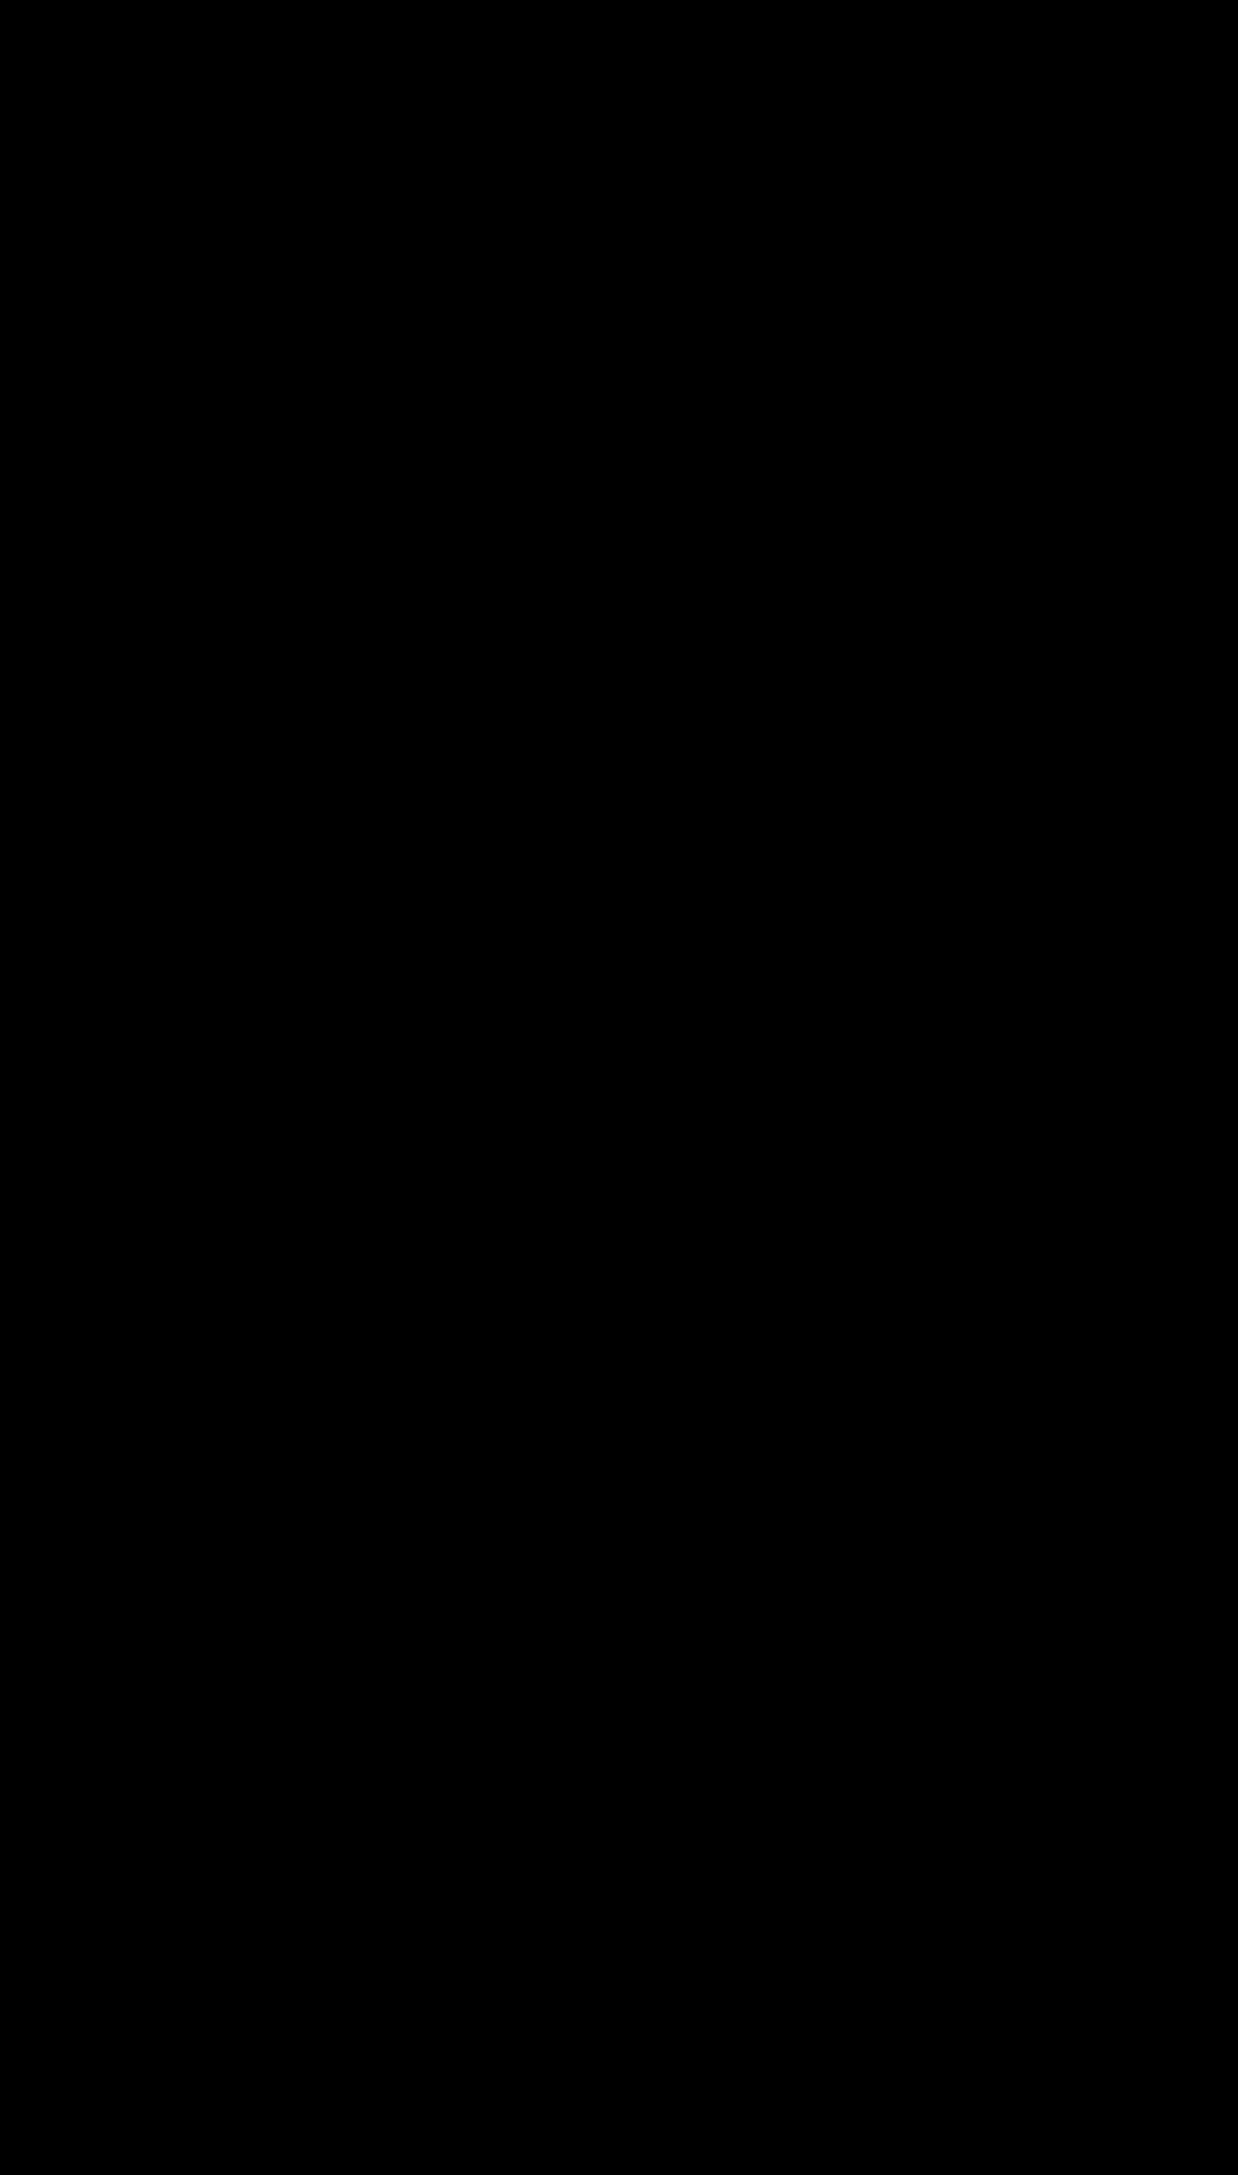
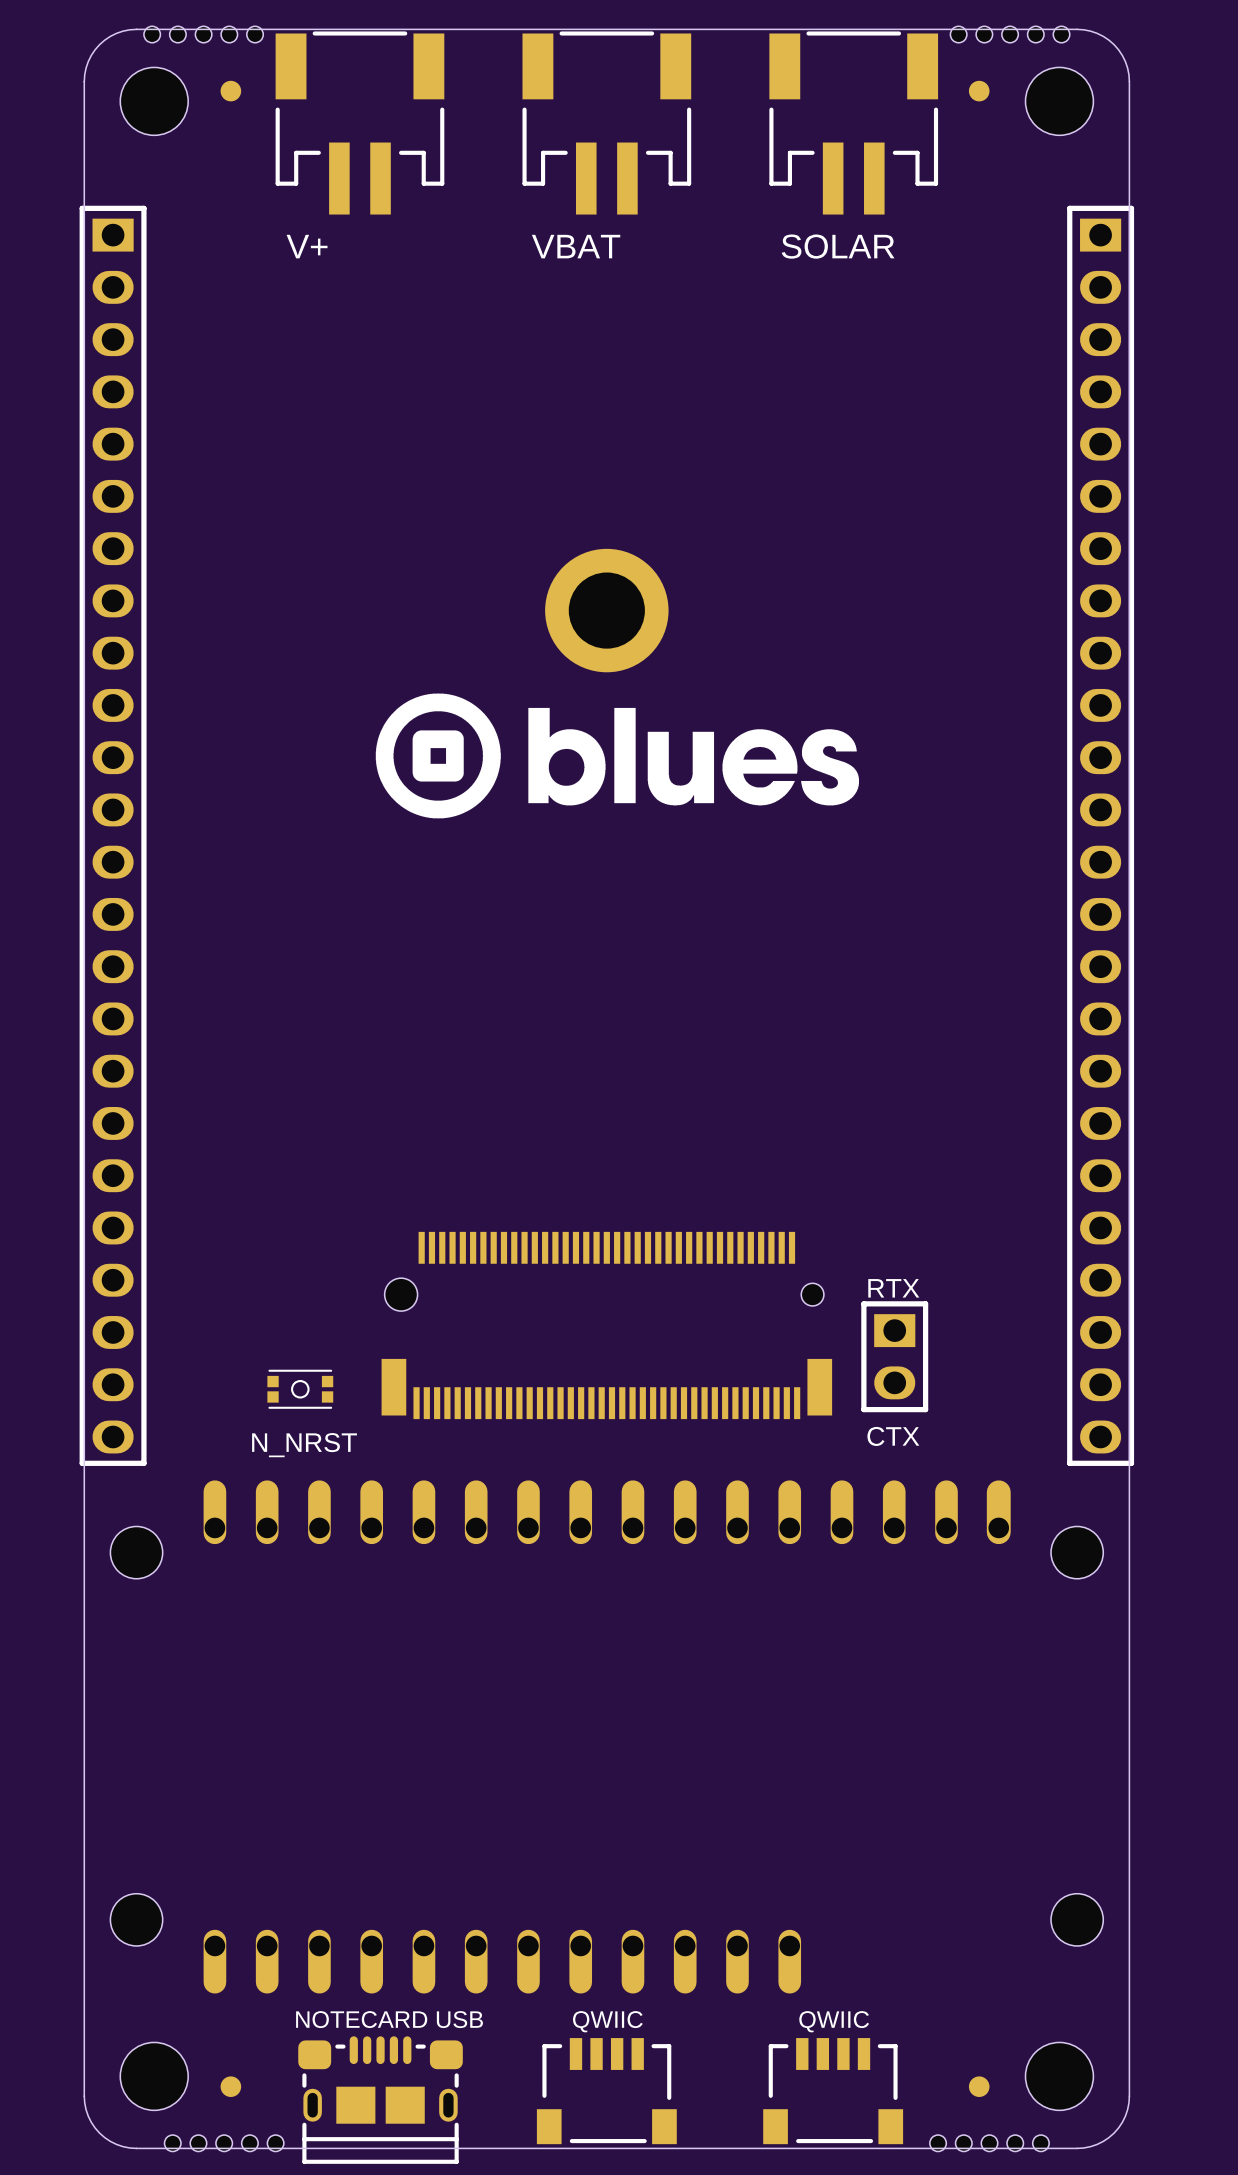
board edge: none -> (136, 29) (1077, 29) (1097, 33) (1108, 40) (1118, 49) (1125, 61) (1129, 81) (1129, 2096) (1125, 2116) (1118, 2127) (1108, 2137) (1097, 2144) (1077, 2148) (136, 2148) (123, 2146) (110, 2141) (95, 2127) (88, 2116) (84, 2096) (84, 81) (88, 61) (99, 44) (116, 33) (136, 29)
part: none -> (152, 34)
part: none -> (177, 34)
part: none -> (203, 34)
part: none -> (229, 34)
part: none -> (255, 34)
part: none -> (958, 34)
part: none -> (984, 34)
part: none -> (1010, 34)
part: none -> (1035, 34)
part: none -> (1061, 34)
part: none -> (230, 91)
part: none -> (979, 91)
part: none -> (154, 101)
part: none -> (1059, 101)
part: none -> (359, 122)
part: none -> (606, 122)
part: none -> (853, 122)
text: none -> V+ (307, 246)
text: none -> VBAT (576, 246)
text: none -> SOLAR (838, 246)
part: none -> (606, 610)
drawing: none -> [375, 693, 501, 819]
drawing: none -> [528, 707, 860, 806]
part: none -> (113, 835)
part: none -> (1100, 835)
text: none -> RTX (893, 1288)
part: none -> (606, 1325)
part: none -> (894, 1356)
part: none -> (300, 1389)
text: none -> CTX (893, 1436)
text: none -> N_NRST (304, 1445)
part: none -> (607, 1512)
part: none -> (136, 1552)
part: none -> (1077, 1552)
part: none -> (136, 1919)
part: none -> (1077, 1919)
part: none -> (502, 1961)
text: none -> NOTECARD USB (389, 2019)
text: none -> QWIIC (607, 2021)
text: none -> QWIIC (834, 2021)
part: none -> (154, 2076)
part: none -> (1059, 2076)
part: none -> (230, 2086)
part: none -> (979, 2086)
part: none -> (606, 2091)
part: none -> (833, 2091)
part: none -> (380, 2100)
part: none -> (172, 2143)
part: none -> (198, 2143)
part: none -> (224, 2143)
part: none -> (249, 2143)
part: none -> (275, 2143)
part: none -> (938, 2143)
part: none -> (963, 2143)
part: none -> (989, 2143)
part: none -> (1015, 2143)
part: none -> (1040, 2143)

